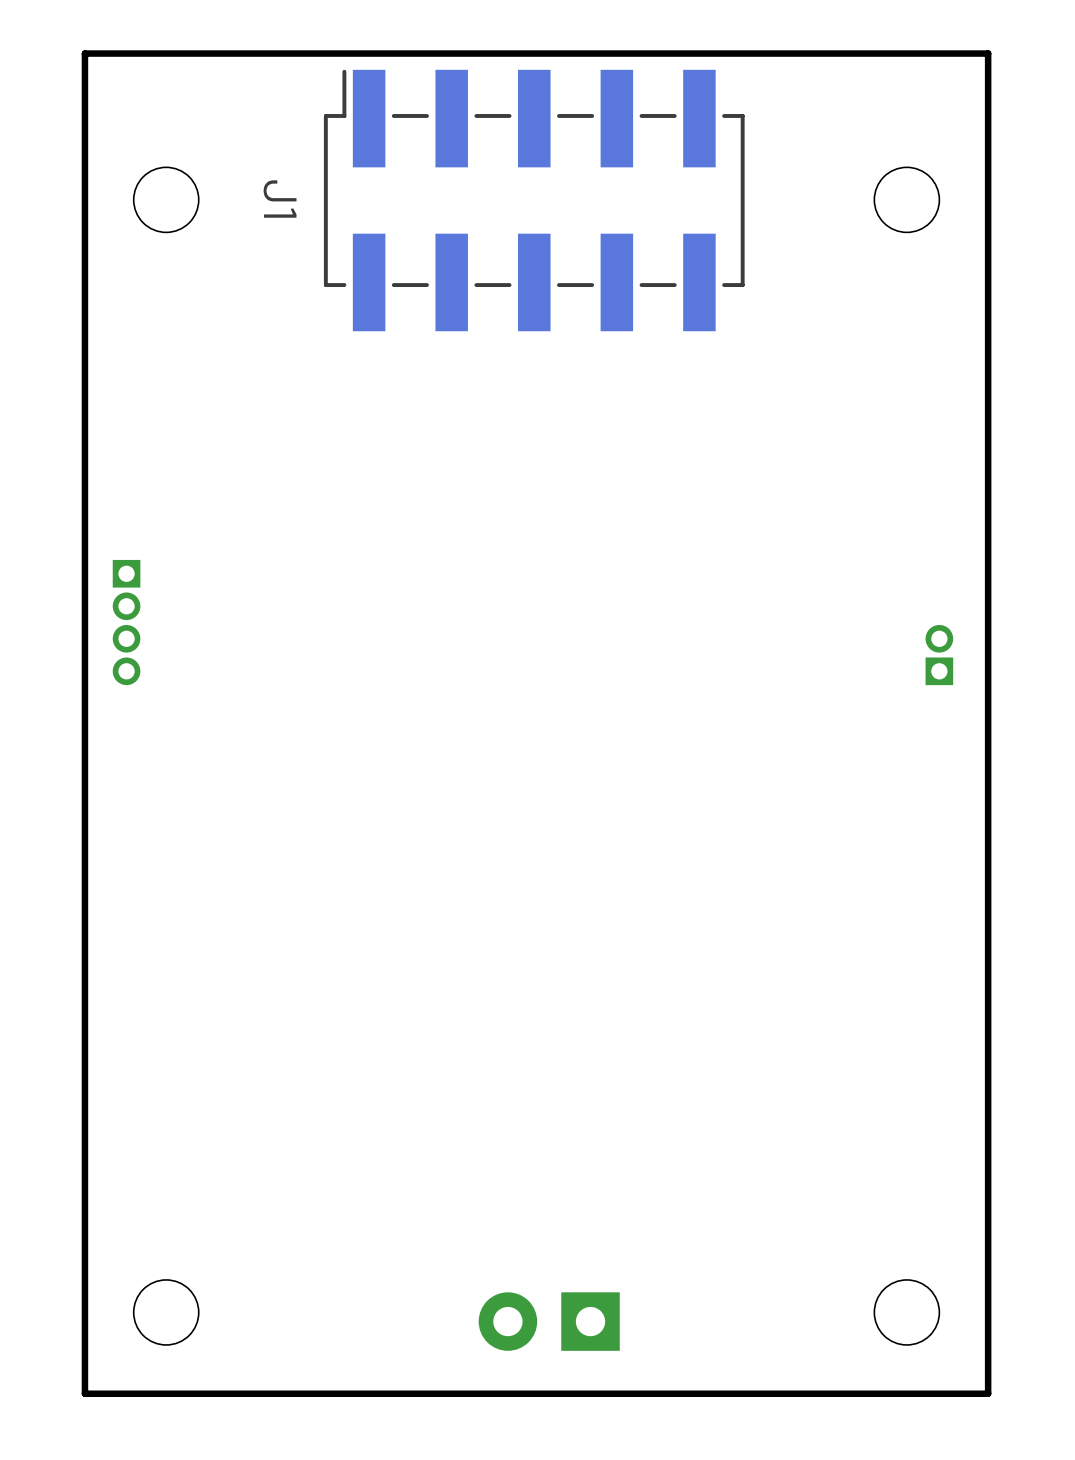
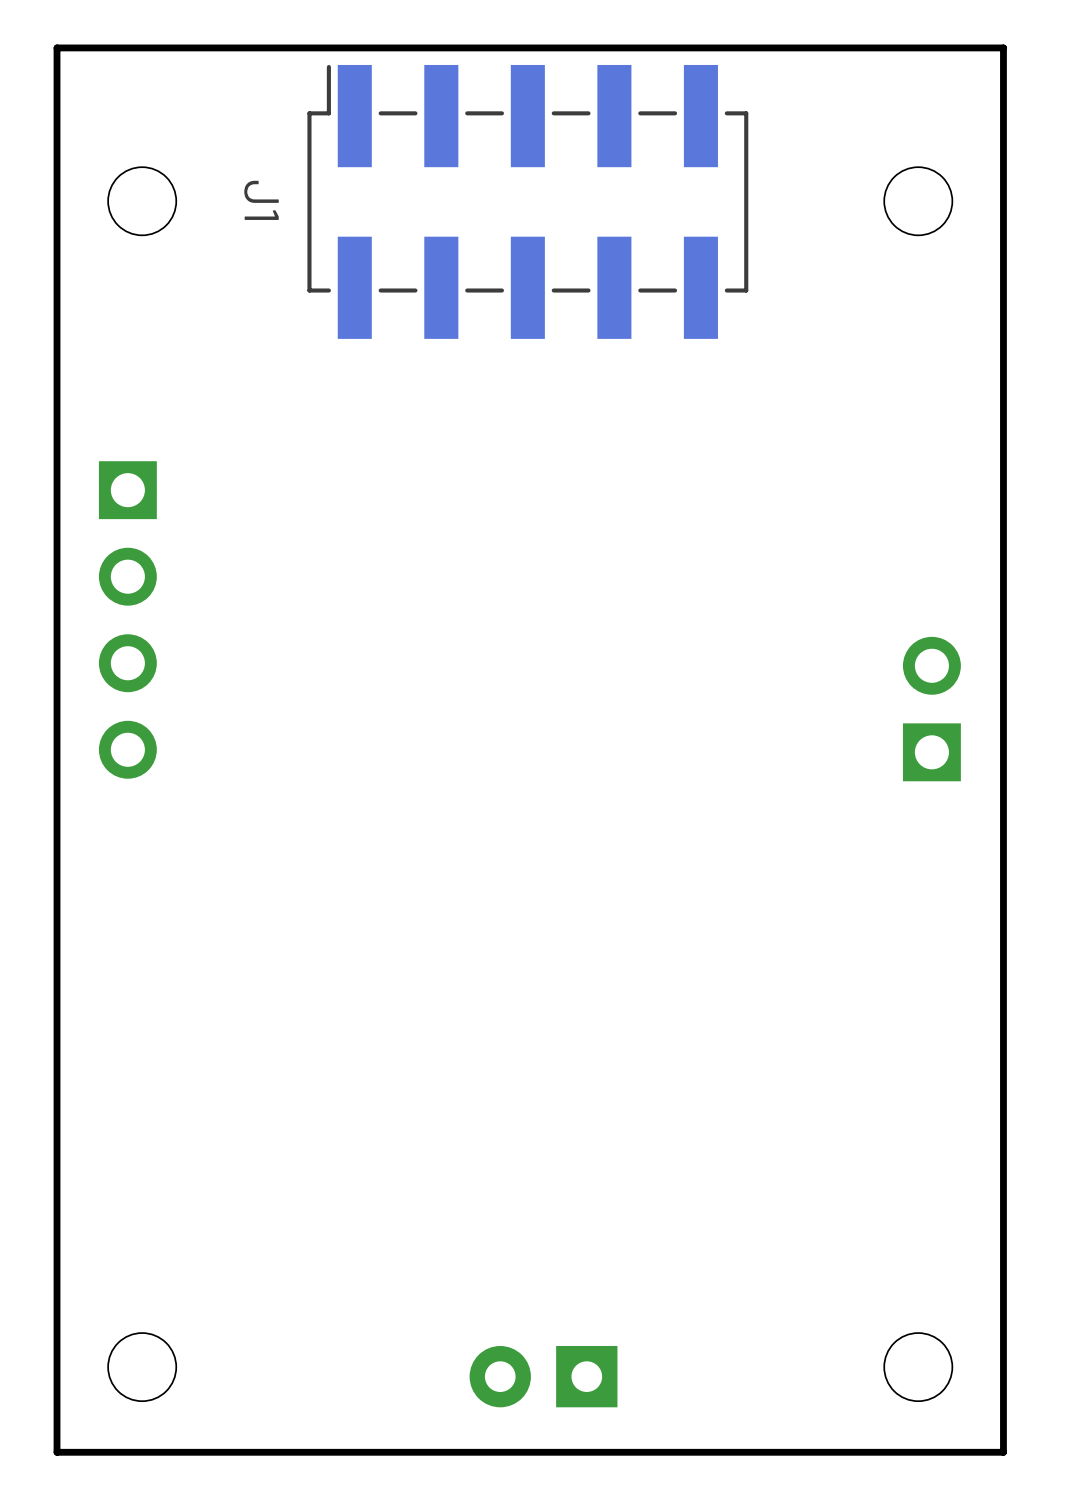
part: none -> (127, 619)
part: (126, 622) -> none
part: (939, 655) -> none
part: none -> (931, 709)

